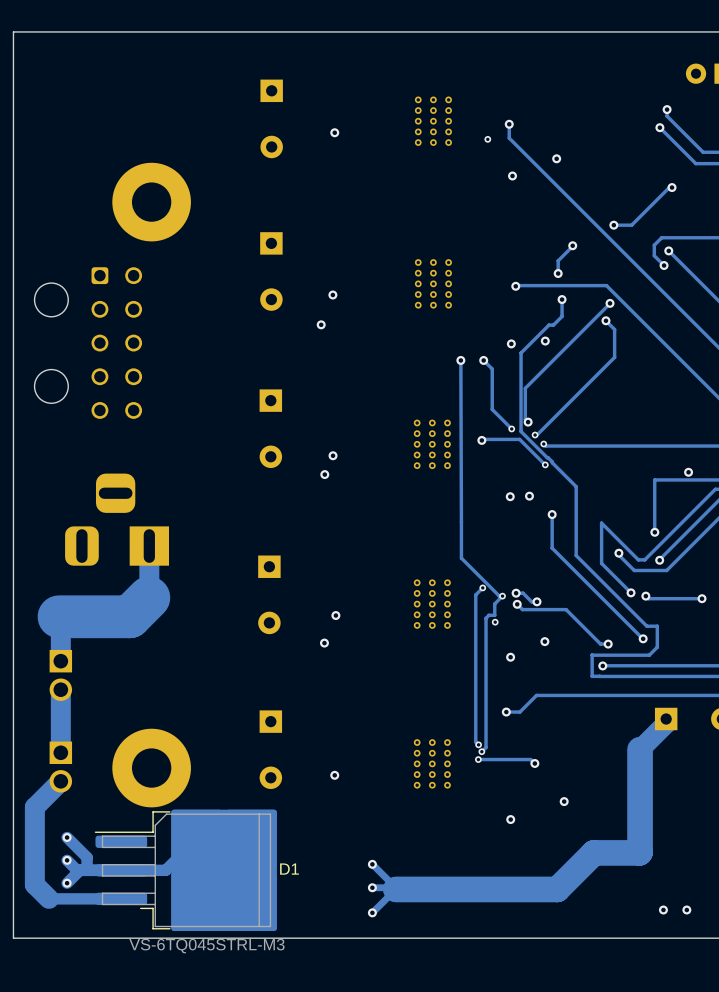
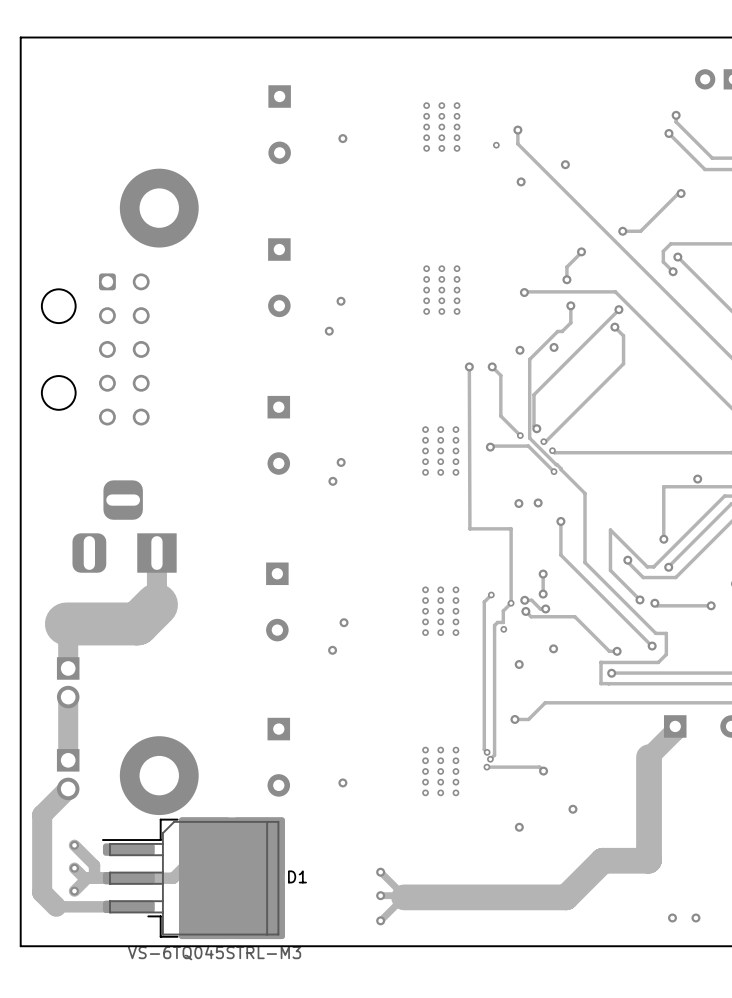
track: (461, 521) (461, 558) (500, 596) -> (469, 528) (511, 528) (511, 603)
track: none -> (543, 574) (543, 594)
via: none -> (543, 574)
via: none -> (543, 594)

